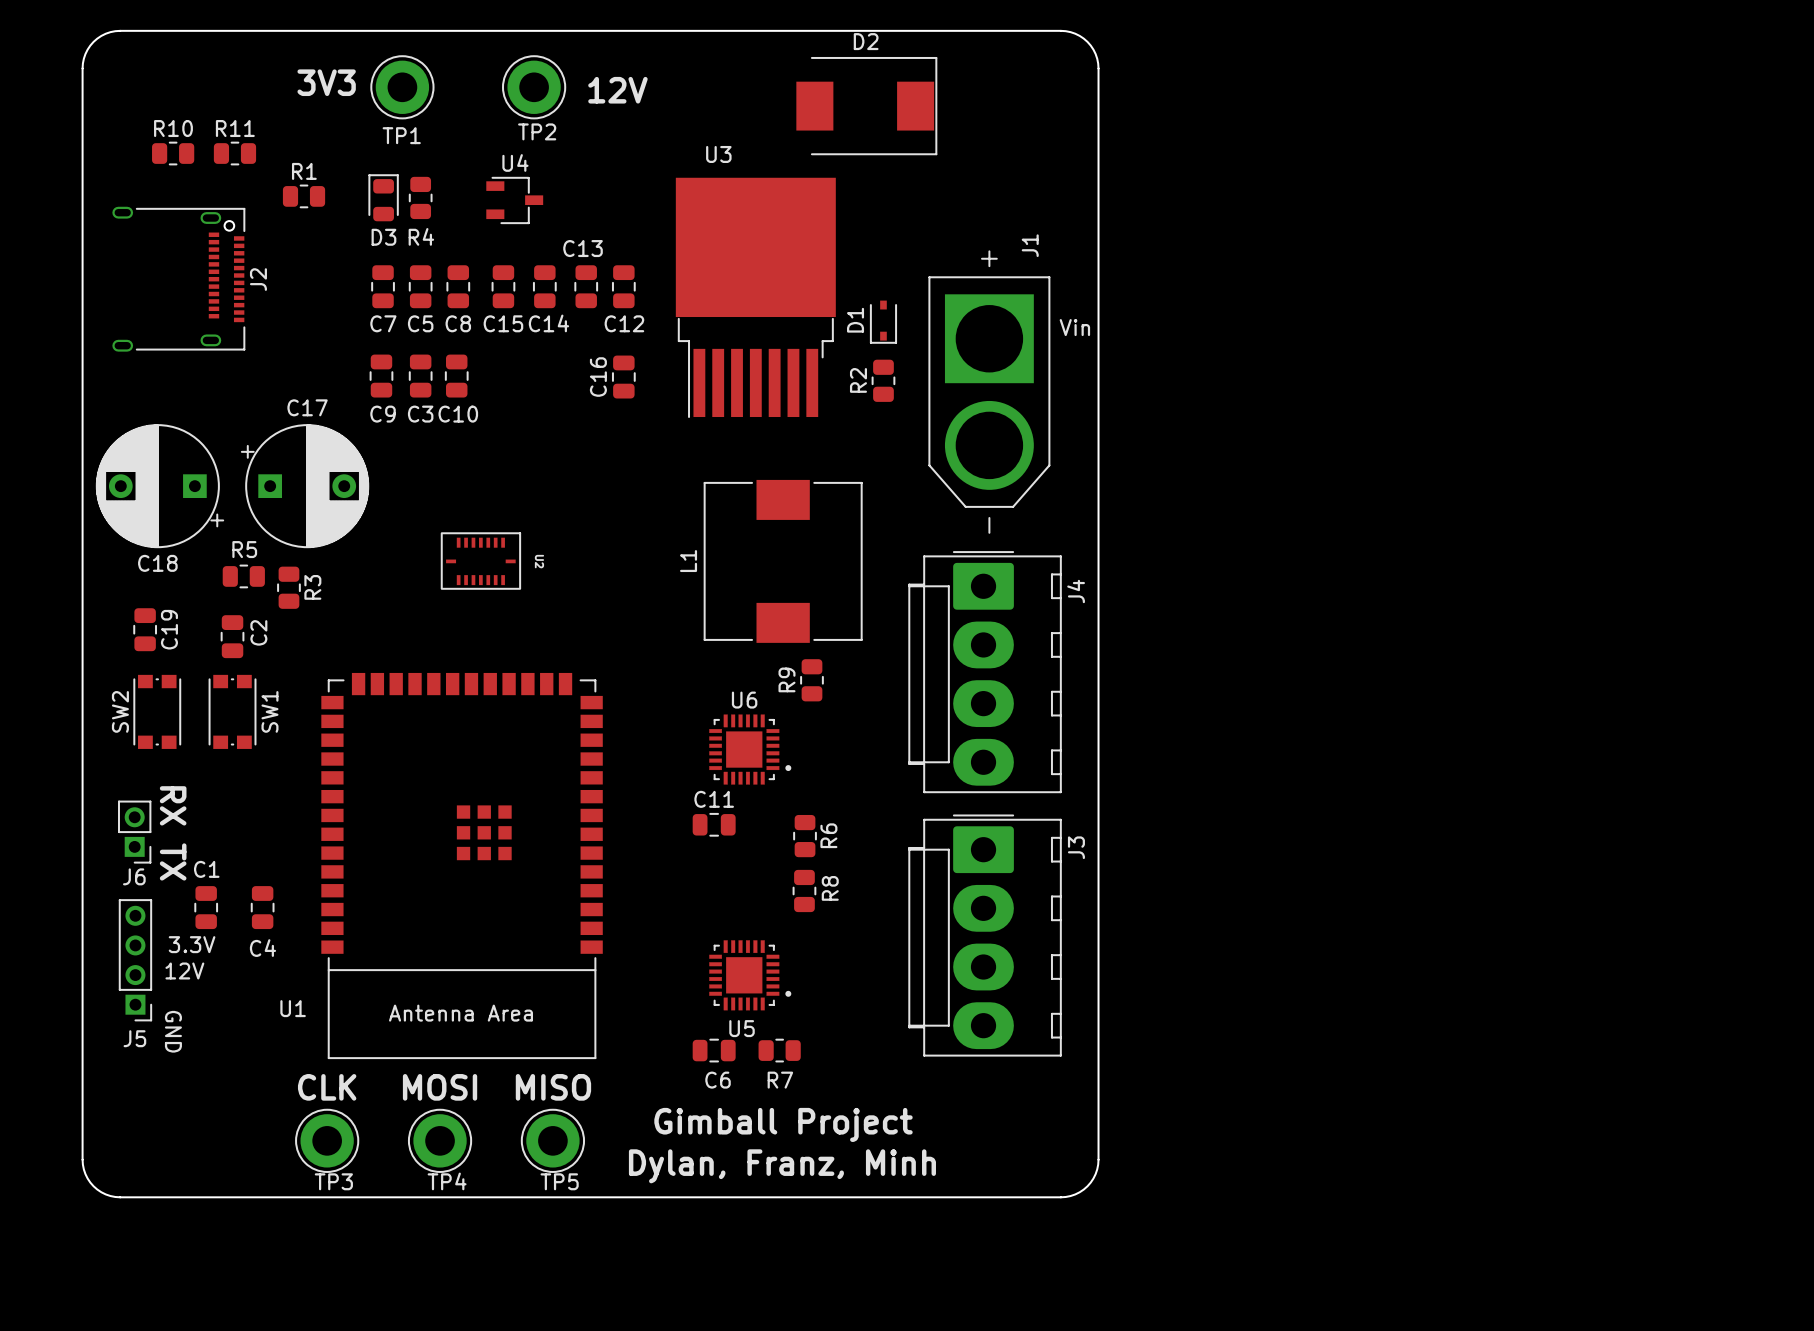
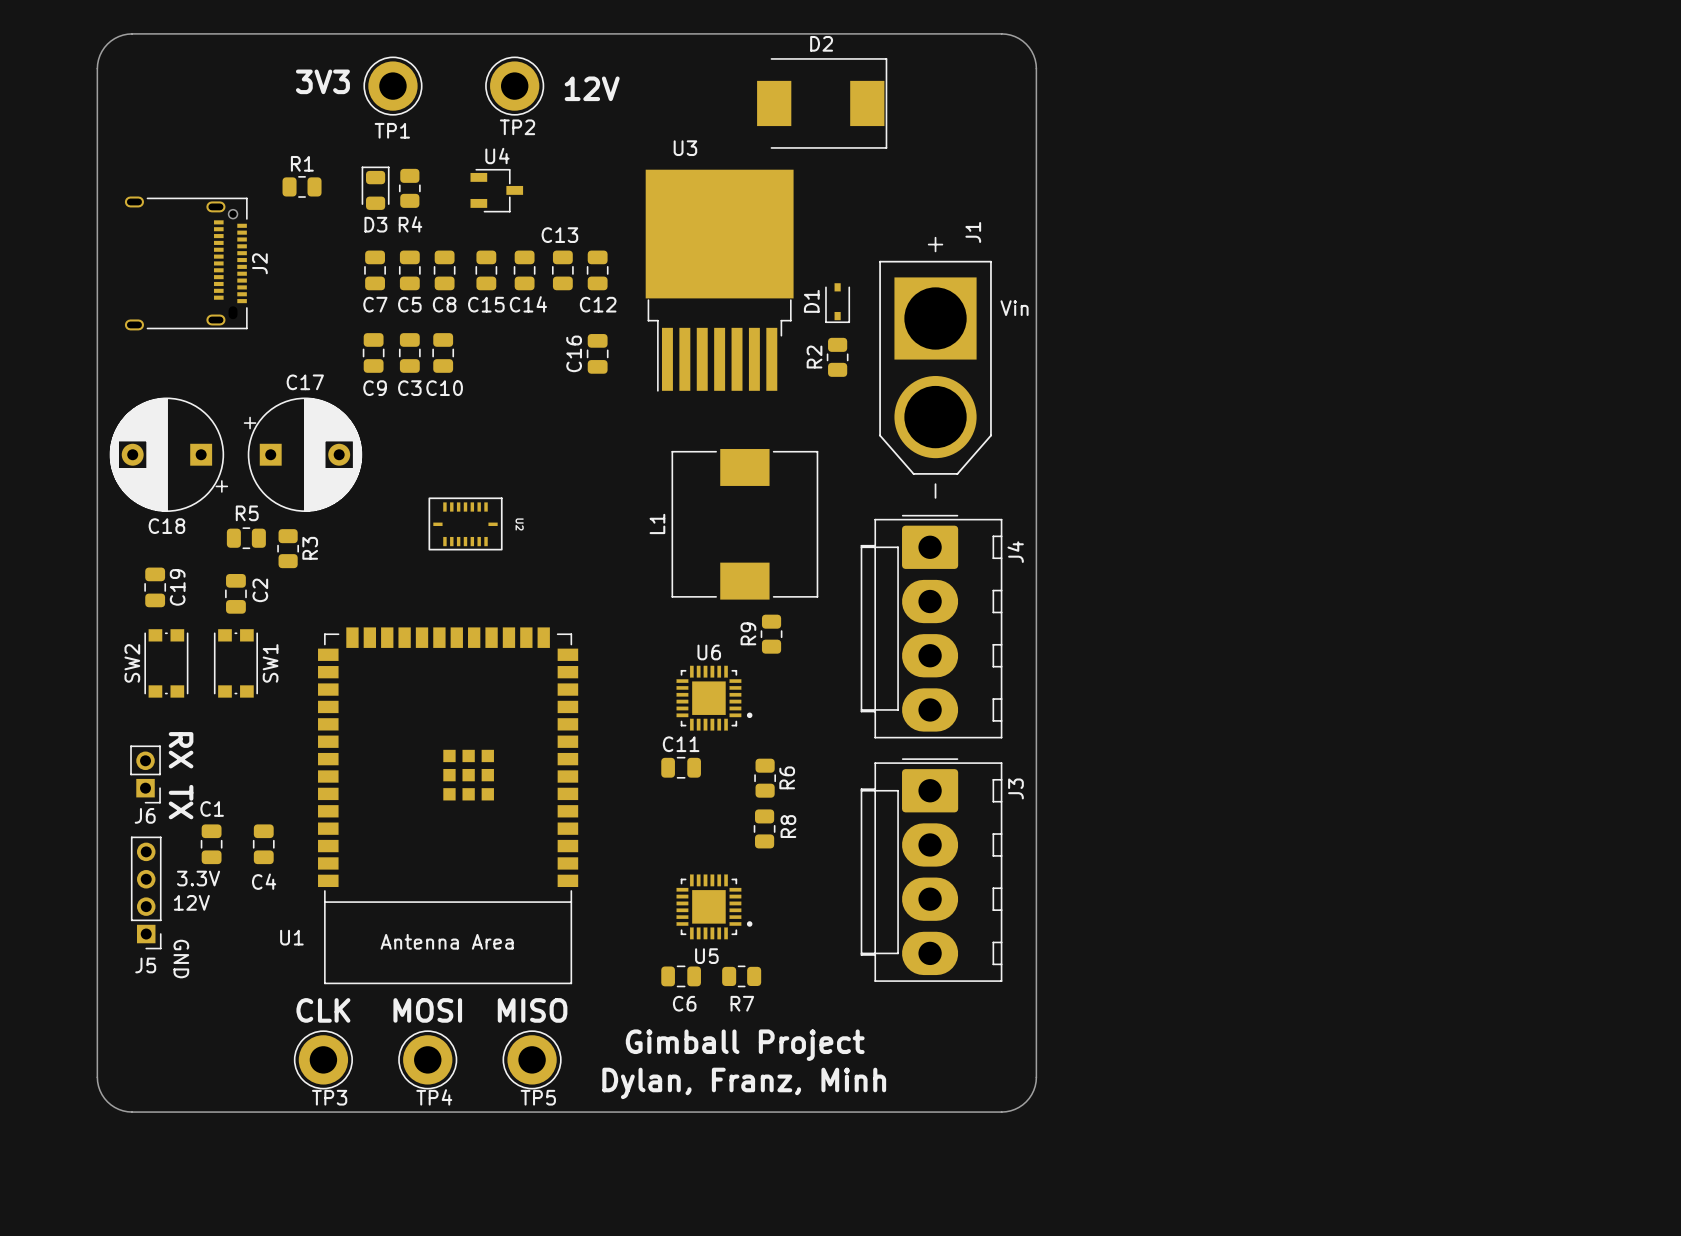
R10: (173, 153) -> none
R11: (234, 153) -> none

